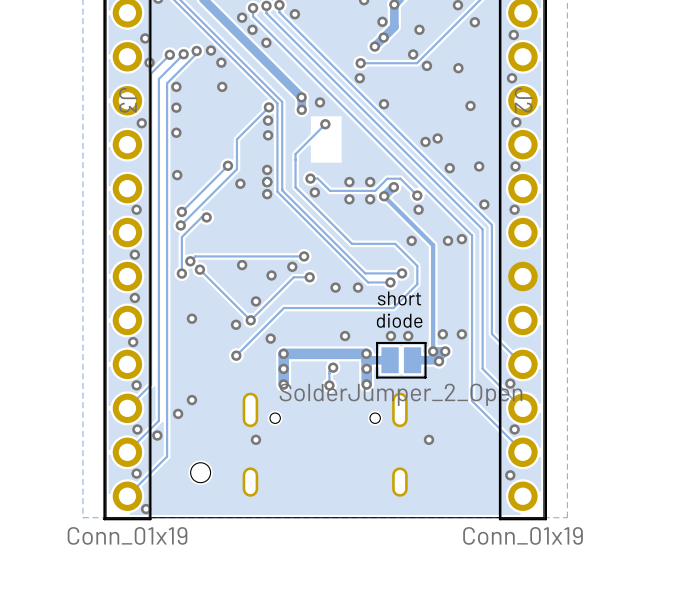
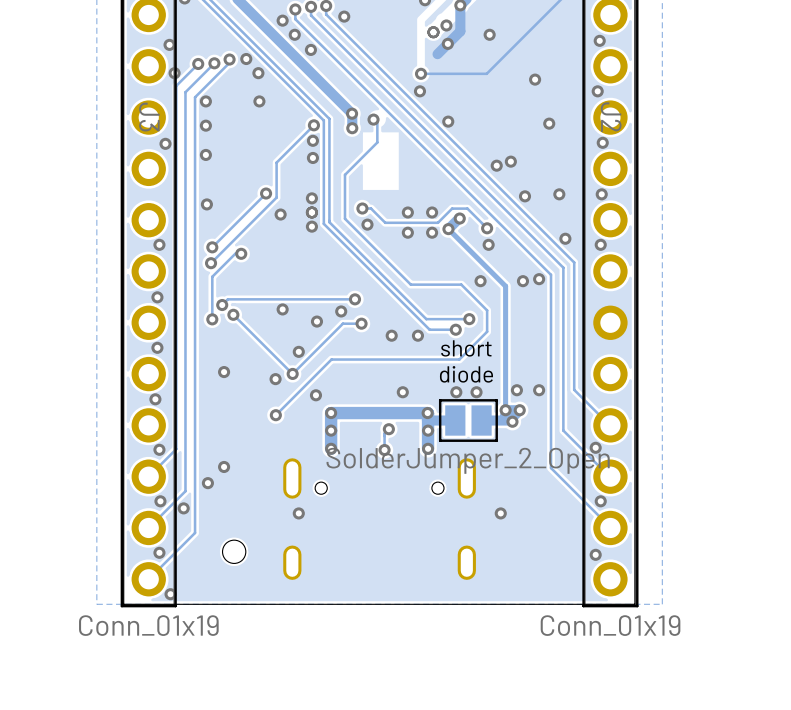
via: (457, 5) -> none
via: (474, 22) -> none
via position: (374, 46) -> (433, 32)
via: (413, 54) -> none
via: (426, 65) -> none
track: (325, 124) (295, 154) -> (377, 118) (377, 142) (344, 174) (344, 179)
via: (325, 124) -> none

